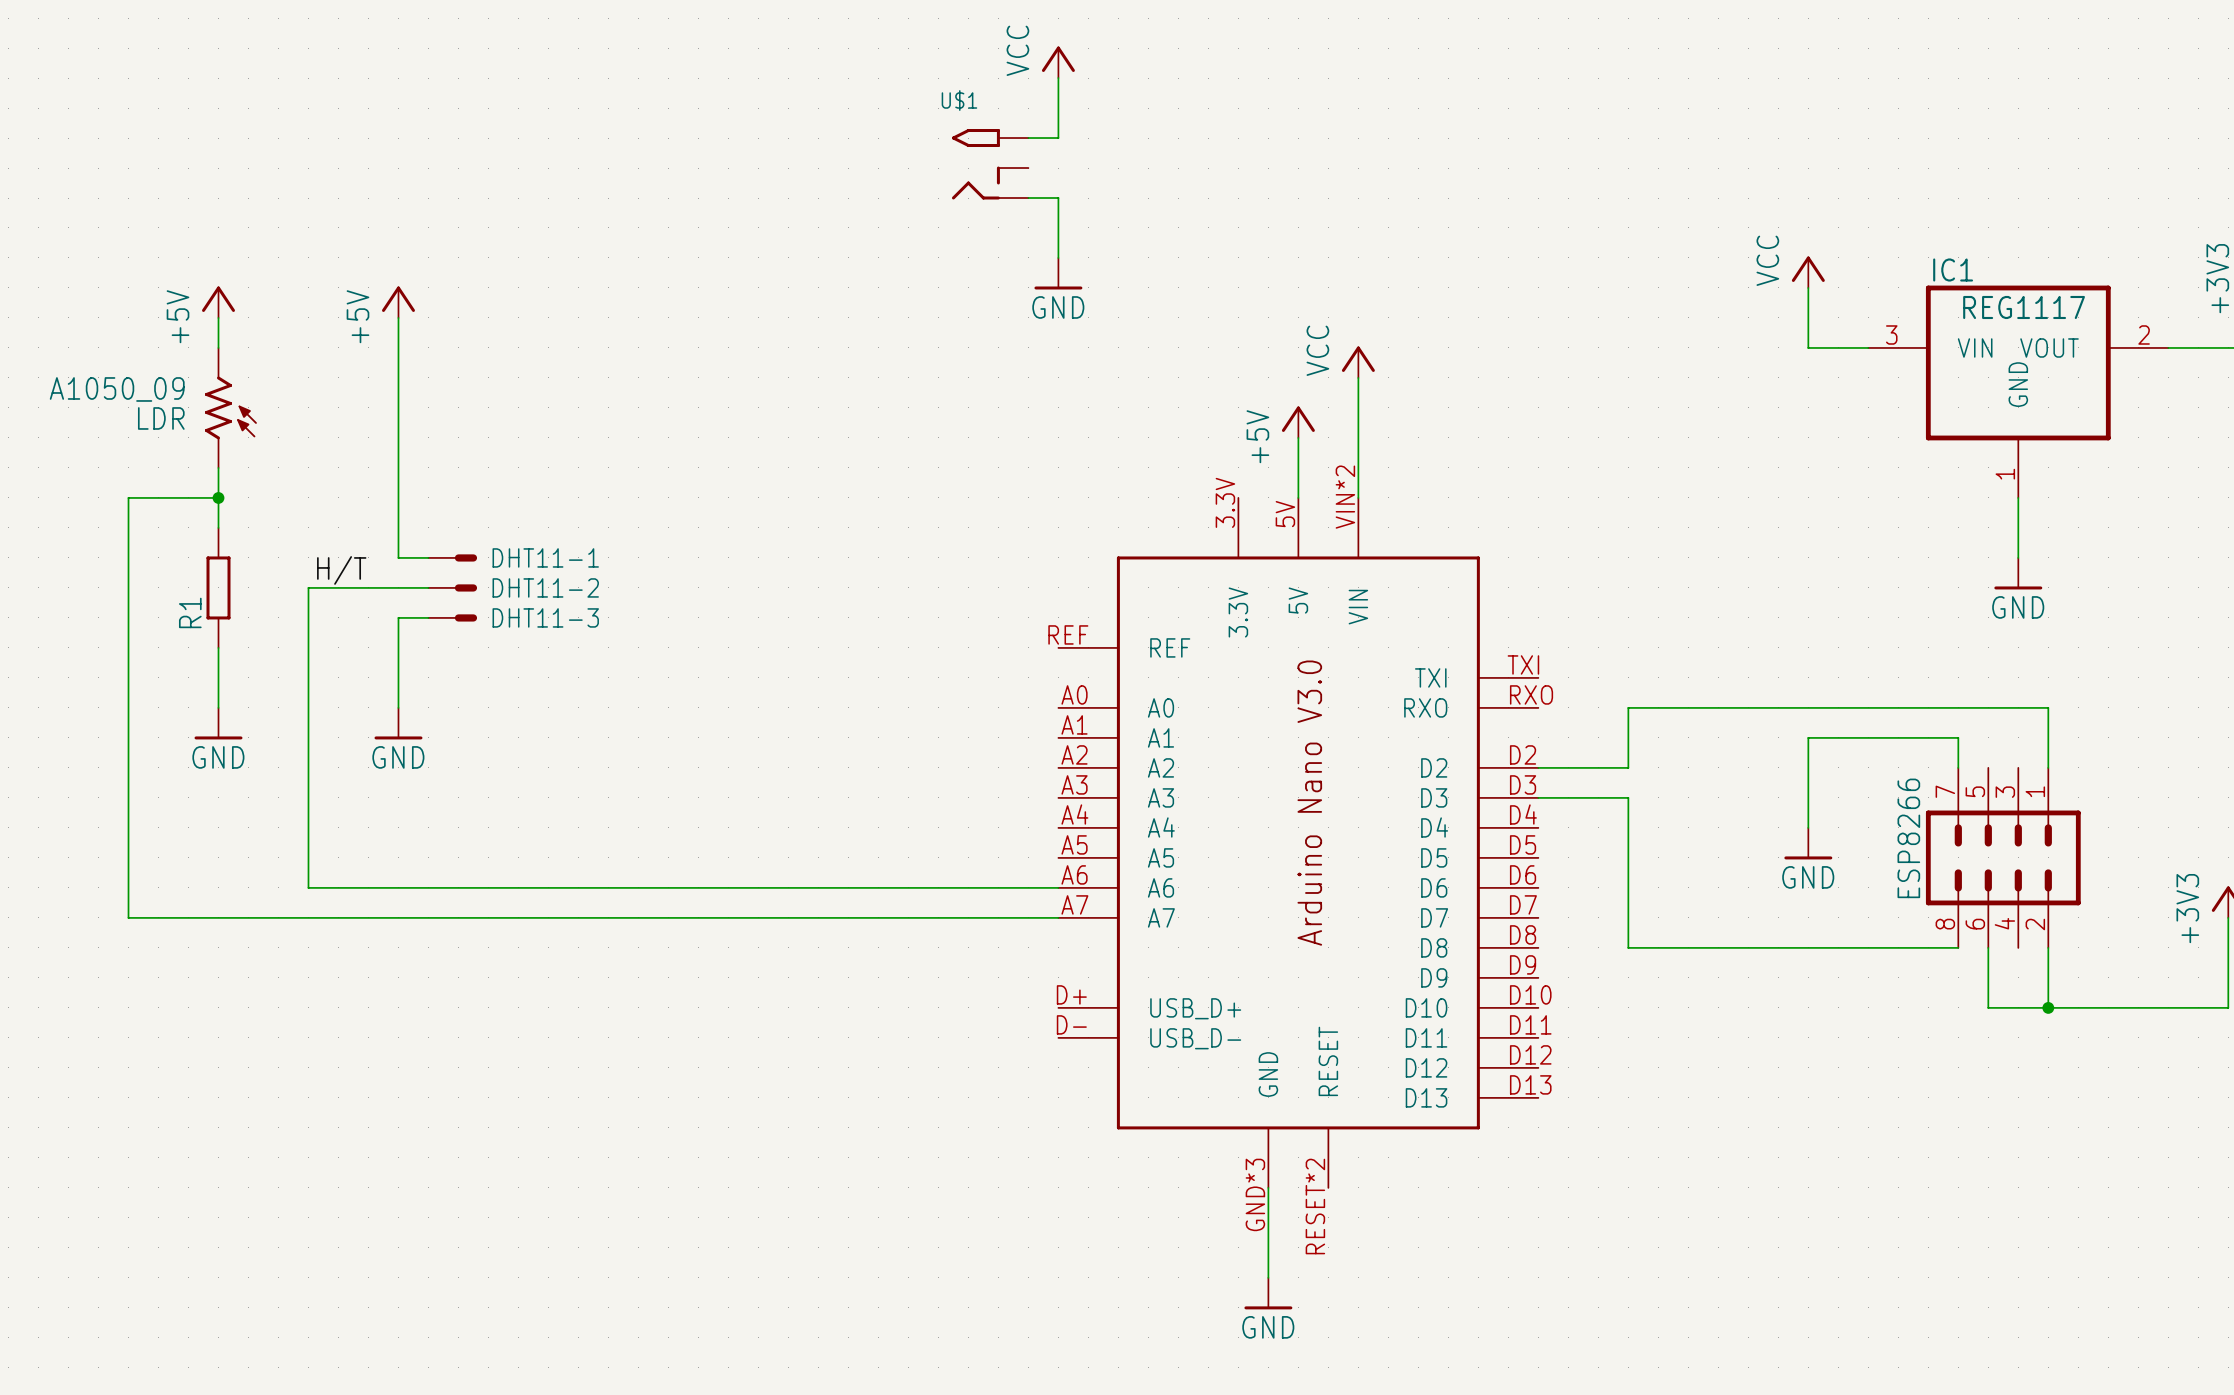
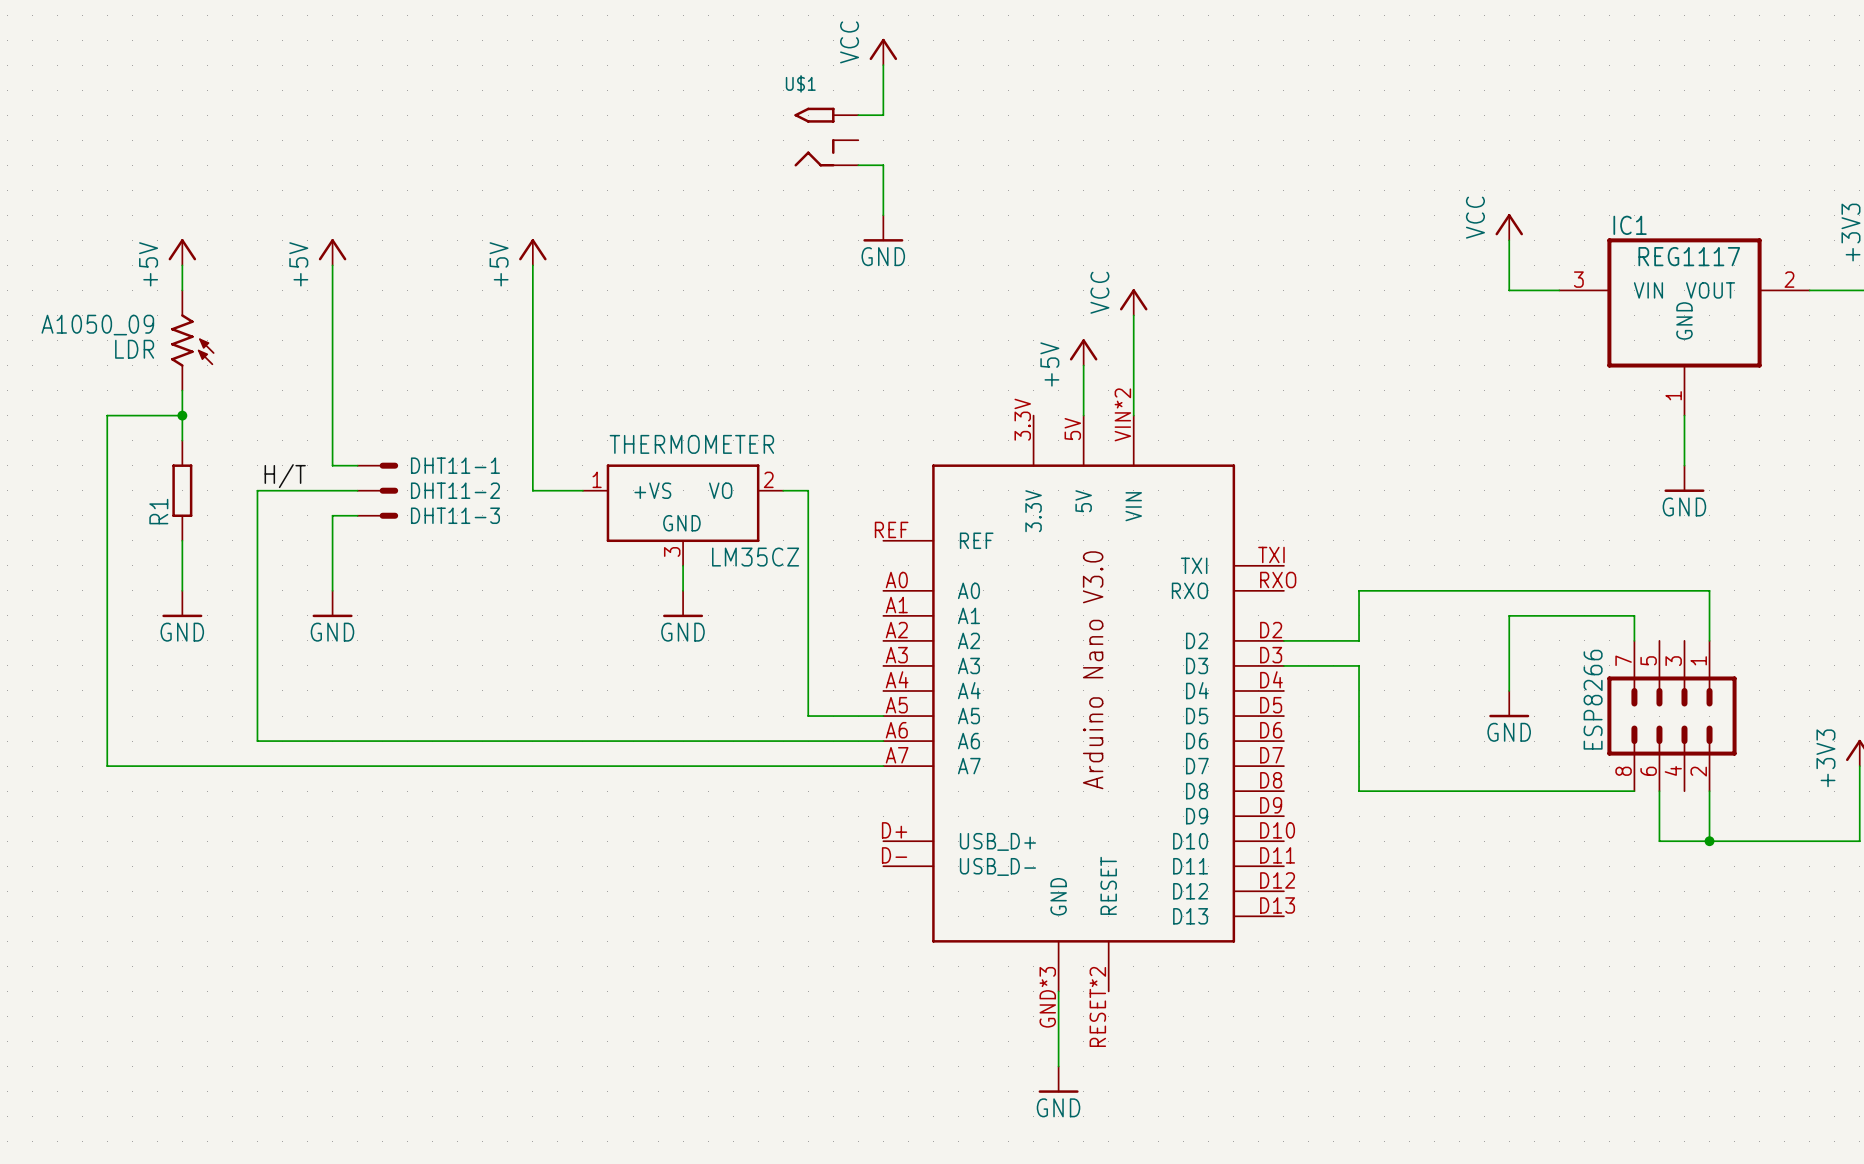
power symbol: none -> +5V (532, 252)
wire: none -> (532, 265) (532, 490) (582, 490)
wire: none -> (783, 490) (808, 490) (808, 716) (883, 716)
THERMOMETER: none -> LM35CZ (683, 515)
wire: none -> (683, 565) (683, 590)
power symbol: none -> GND (683, 603)

